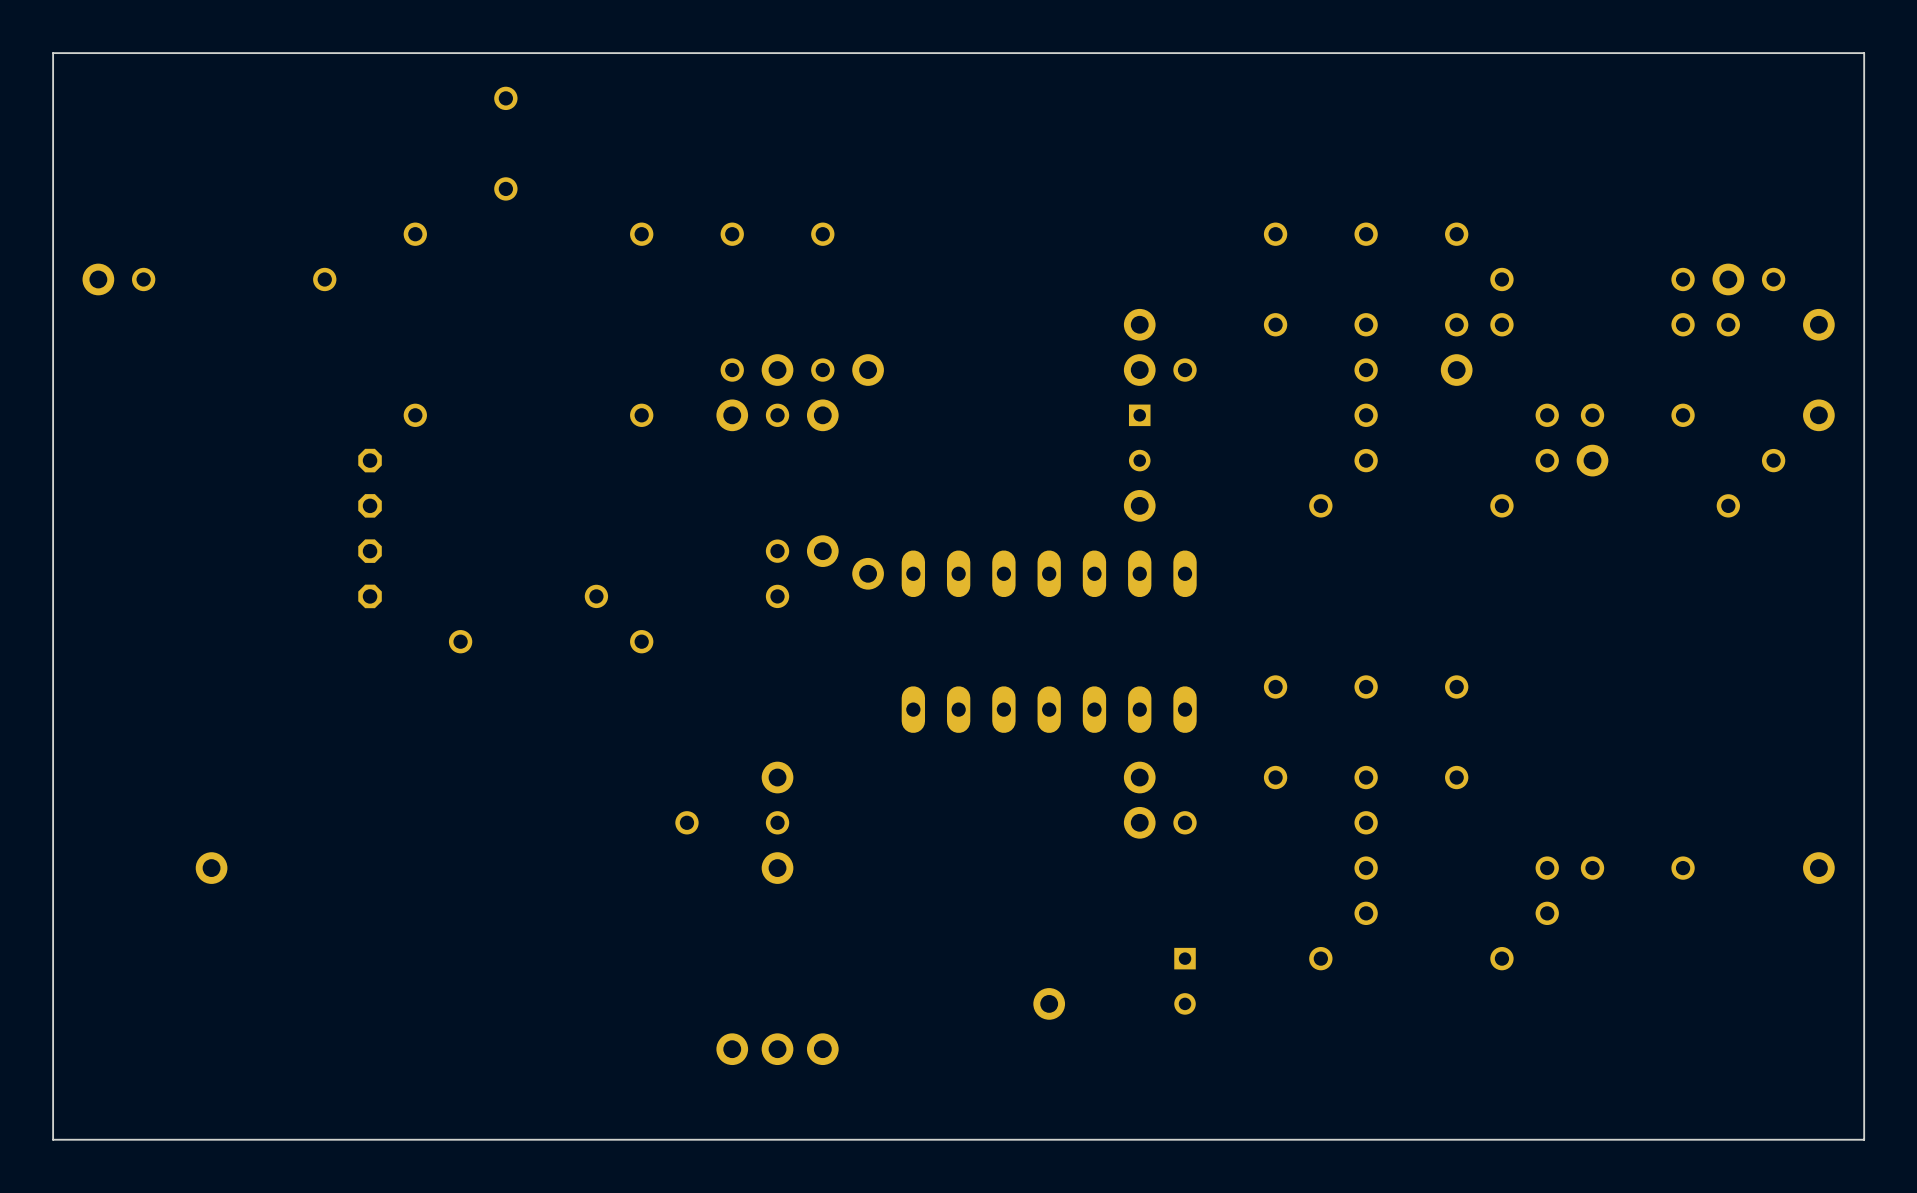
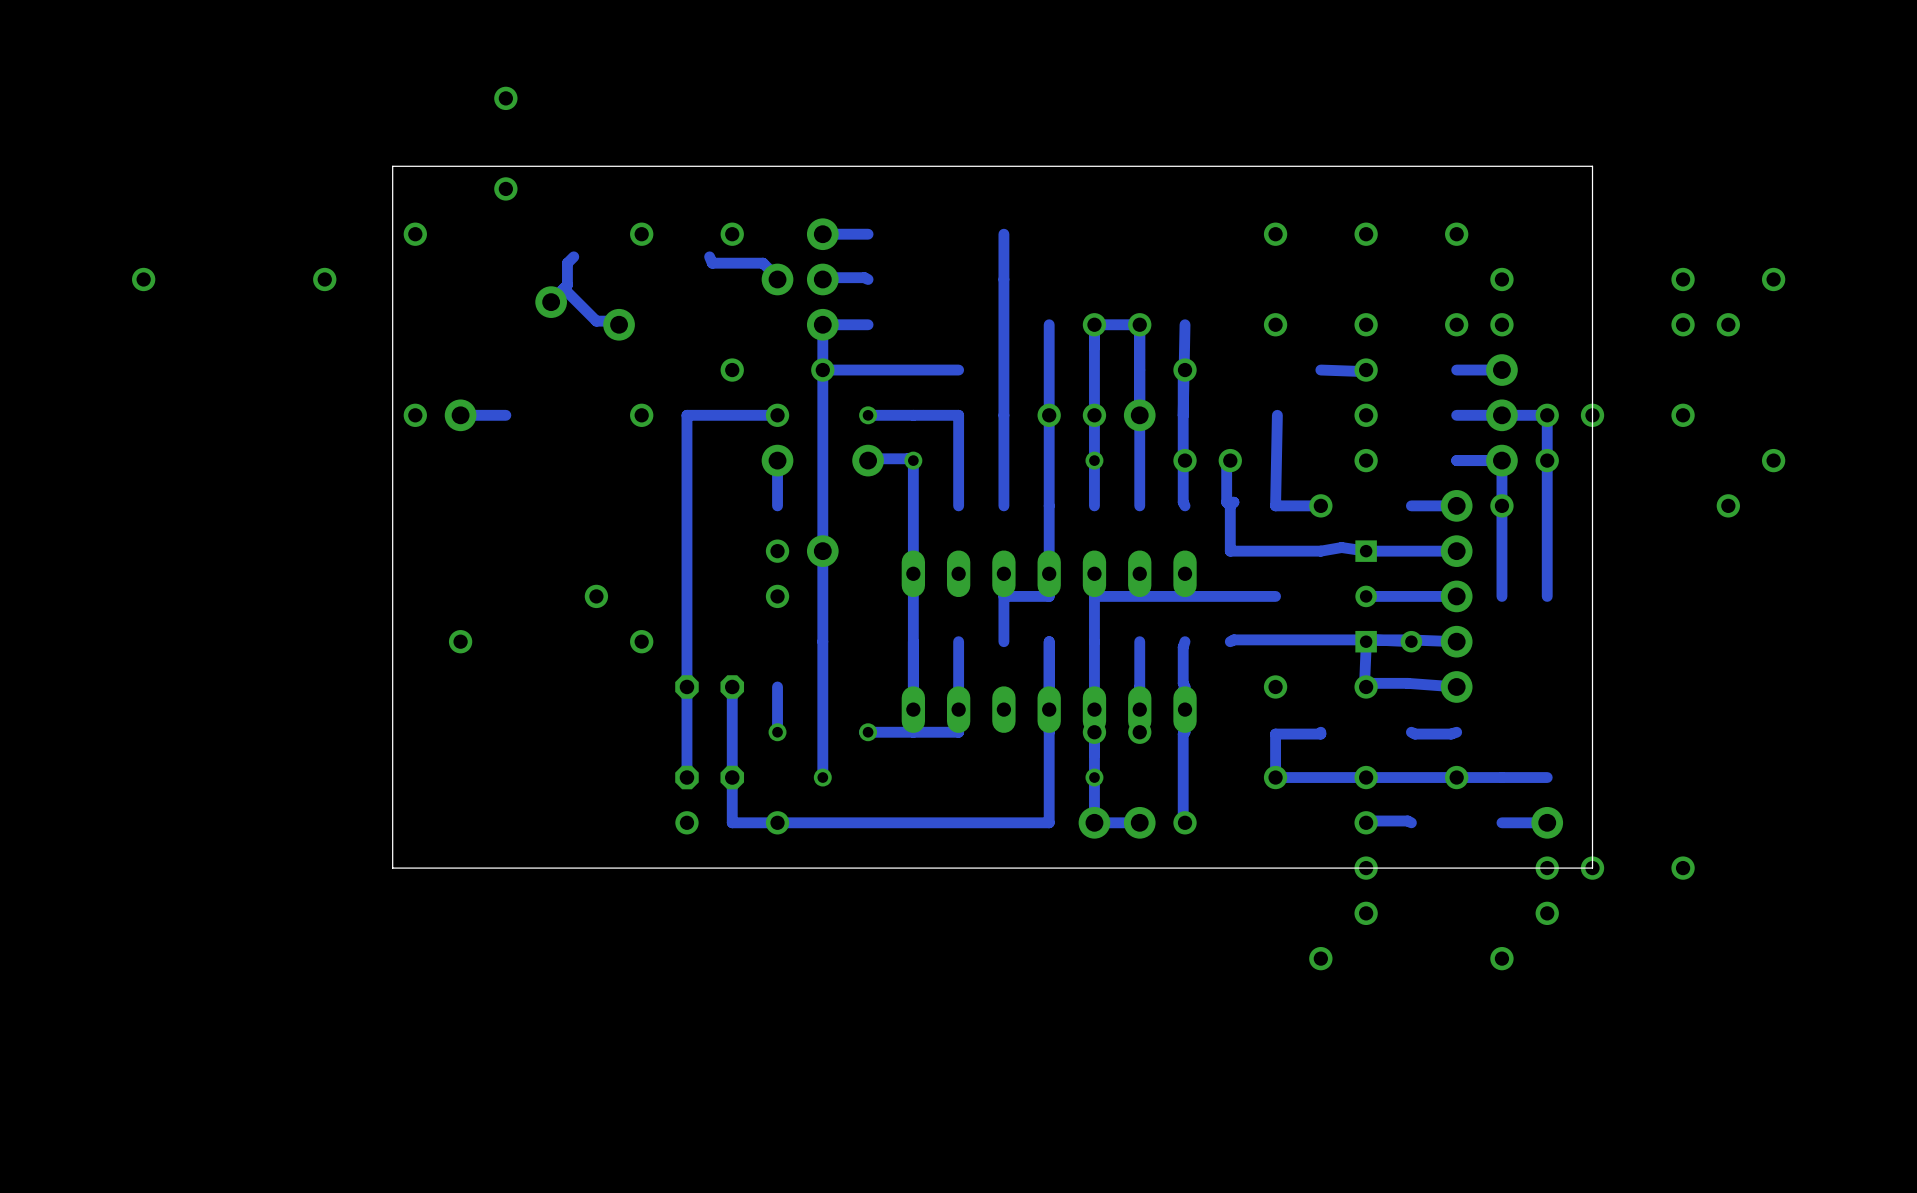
board edge: (1864, 53) (53, 53) (53, 1139) (1864, 1139) (1864, 53) -> none
board edge: none -> (1592, 166) (392, 166) (392, 868) (1592, 868) (1592, 166)
part: none -> (822, 234)
track: none -> (868, 234) (822, 234)
track: none -> (1003, 234) (1003, 505)
track: none -> (573, 256) (567, 263) (567, 284) (551, 302)
track: none -> (709, 256) (712, 263) (763, 263) (777, 279)
part: (98, 279) -> none
part: none -> (777, 279)
part: none -> (822, 279)
track: none -> (868, 279) (864, 277) (828, 277) (822, 279)
part: (1728, 279) -> none
track: none -> (563, 288) (596, 321) (618, 321) (619, 324)
part: none -> (551, 302)
part: none -> (619, 324)
part: none -> (822, 324)
track: none -> (868, 324) (822, 324) (822, 777)
track: none -> (1049, 324) (1049, 596) (1003, 596) (1003, 641)
part: none -> (1117, 324)
part: (1139, 324) -> none
track: none -> (1185, 324) (1183, 415)
part: (1818, 324) -> none
part: (777, 370) -> none
part: (868, 370) -> none
track: none -> (958, 370) (822, 370)
part: (1139, 370) -> none
track: none -> (1185, 370) (1183, 371) (1183, 458) (1185, 460) (1183, 466) (1183, 502) (1185, 505)
track: none -> (1366, 370) (1362, 371) (1371, 371) (1320, 370)
part: (1456, 370) -> none
track: none -> (1501, 370) (1456, 370)
part: none -> (1501, 370)
part: none -> (460, 415)
track: none -> (505, 415) (460, 415)
part: (732, 415) -> none
track: none -> (777, 415) (686, 415) (686, 777)
part: (822, 415) -> none
track: none -> (868, 415) (958, 415) (958, 505)
via: none -> (868, 415)
part: none -> (1071, 415)
part: none -> (1139, 415)
track: none -> (1277, 415) (1275, 505) (1320, 505)
track: none -> (1456, 415) (1547, 415) (1547, 596)
part: none -> (1501, 415)
part: (1818, 415) -> none
part: (1139, 437) -> none
track: none -> (777, 460) (777, 505)
part: none -> (777, 460)
track: none -> (868, 460) (871, 458) (907, 458) (913, 460) (913, 686)
part: none -> (868, 460)
via: none -> (913, 460)
via: none -> (1094, 460)
part: none -> (1207, 460)
track: none -> (1230, 460) (1226, 466) (1226, 502) (1230, 505) (1233, 502) (1230, 502) (1230, 551) (1320, 551) (1341, 547) (1366, 551) (1456, 551)
track: none -> (1456, 460) (1501, 460) (1501, 596)
part: none -> (1501, 460)
part: (1592, 460) -> none
part: (370, 483) -> none
track: none -> (1139, 505) (1139, 324) (1094, 324) (1094, 505)
part: (1139, 505) -> none
track: none -> (1456, 505) (1411, 505)
part: none -> (1456, 505)
part: none -> (1456, 551)
part: (370, 573) -> none
part: (868, 573) -> none
part: none -> (1366, 573)
track: none -> (1275, 596) (1094, 596) (1094, 822) (1139, 822)
track: none -> (1456, 596) (1366, 596)
part: none -> (1456, 596)
track: none -> (958, 641) (958, 732) (864, 732)
track: none -> (1049, 641) (1049, 822) (732, 822) (732, 686)
track: none -> (1139, 641) (1139, 732)
track: none -> (1185, 641) (1183, 647) (1183, 683) (1185, 686) (1183, 690) (1183, 726) (1185, 732) (1183, 734) (1183, 820) (1185, 822)
track: none -> (1230, 641) (1233, 639) (1366, 639) (1364, 690) (1371, 683) (1407, 683) (1456, 686)
part: none -> (1388, 641)
track: none -> (1456, 641) (1371, 639) (1411, 641)
part: none -> (1456, 641)
part: none -> (709, 686)
track: none -> (777, 686) (777, 732)
part: none -> (1456, 686)
via: none -> (777, 732)
via: none -> (868, 732)
part: none -> (1117, 732)
track: none -> (1320, 732) (1320, 734) (1275, 734) (1275, 777) (1547, 777)
track: none -> (1456, 732) (1451, 734) (1415, 734) (1411, 732)
part: none -> (709, 777)
part: (777, 777) -> none
via: none -> (822, 777)
via: none -> (1094, 777)
part position: (1139, 777) -> (1094, 822)
track: none -> (1411, 822) (1407, 820) (1371, 820) (1366, 822)
track: none -> (1547, 822) (1501, 822)
part: none -> (1547, 822)
part: (211, 868) -> none
part: (777, 868) -> none
part: (1818, 868) -> none
part: (1185, 981) -> none
part: (1049, 1003) -> none
part: (732, 1049) -> none
part: (777, 1049) -> none
part: (822, 1049) -> none

